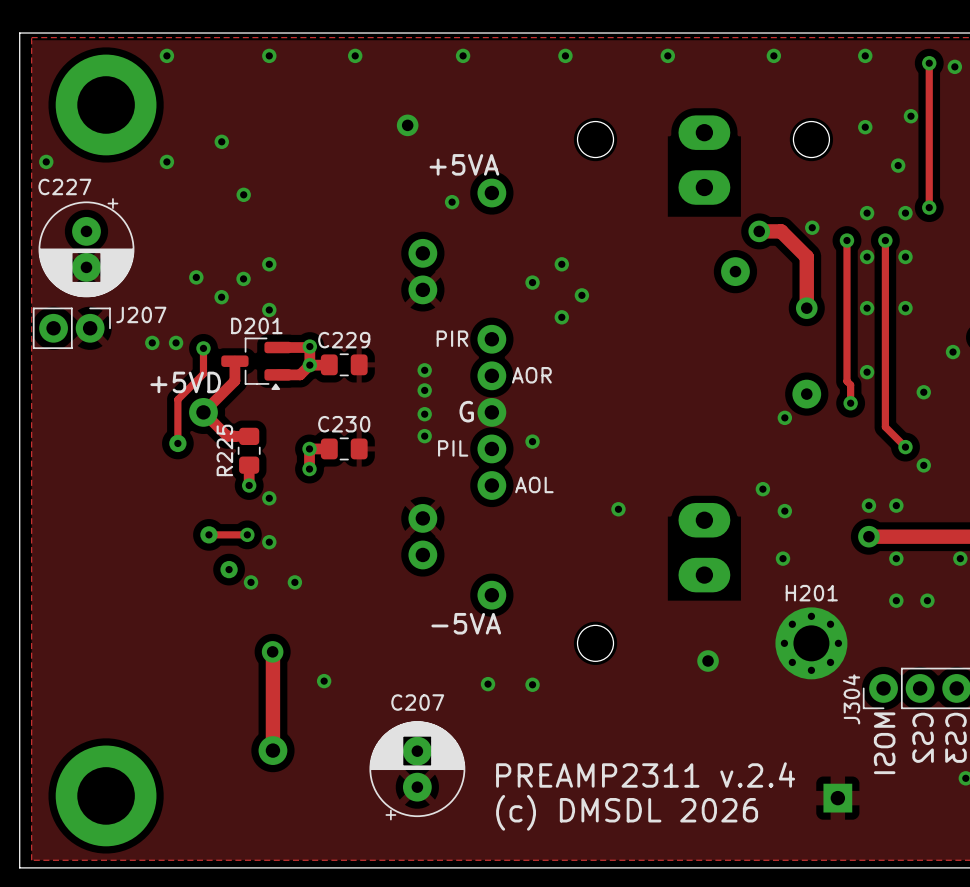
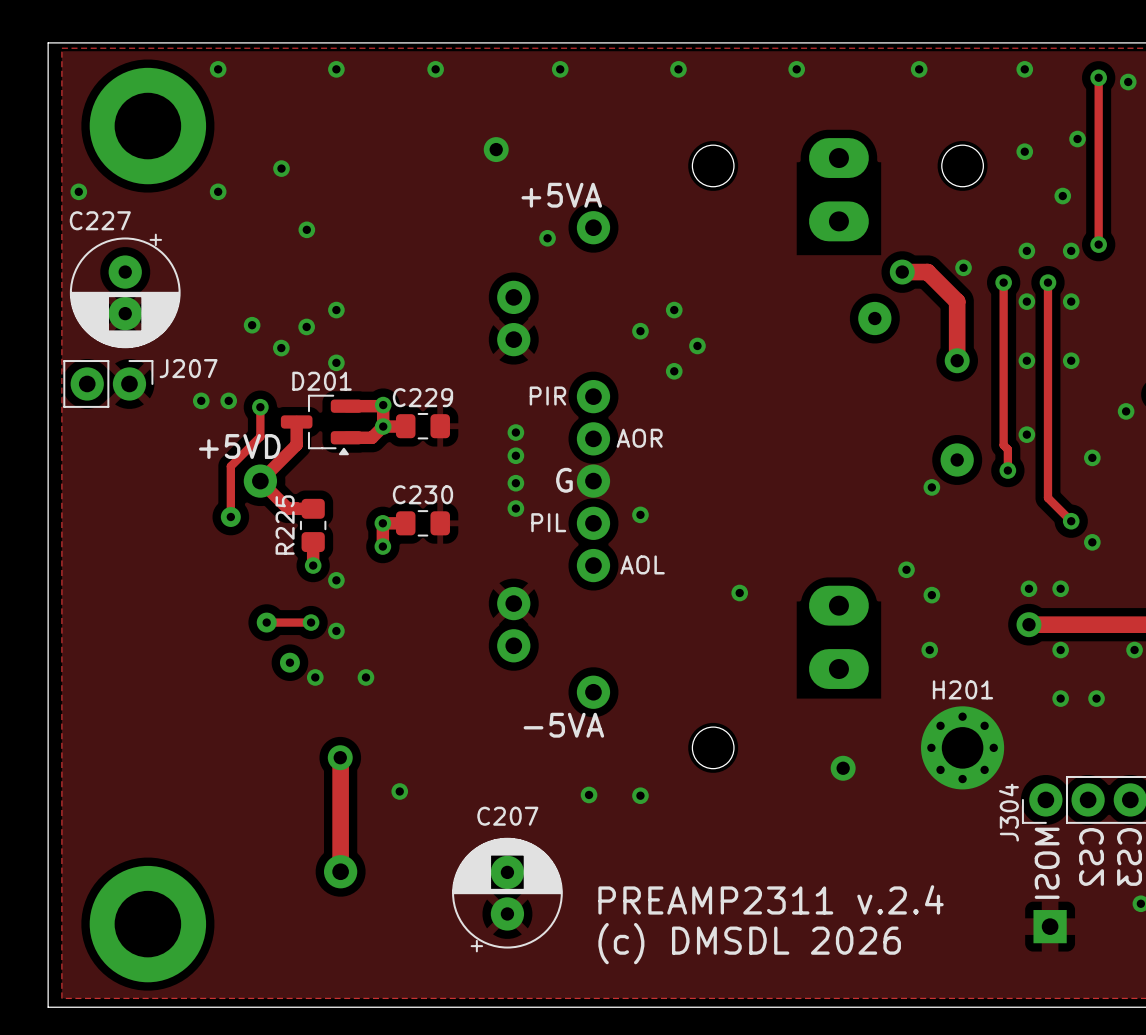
part position: (837, 798) -> (1050, 926)

